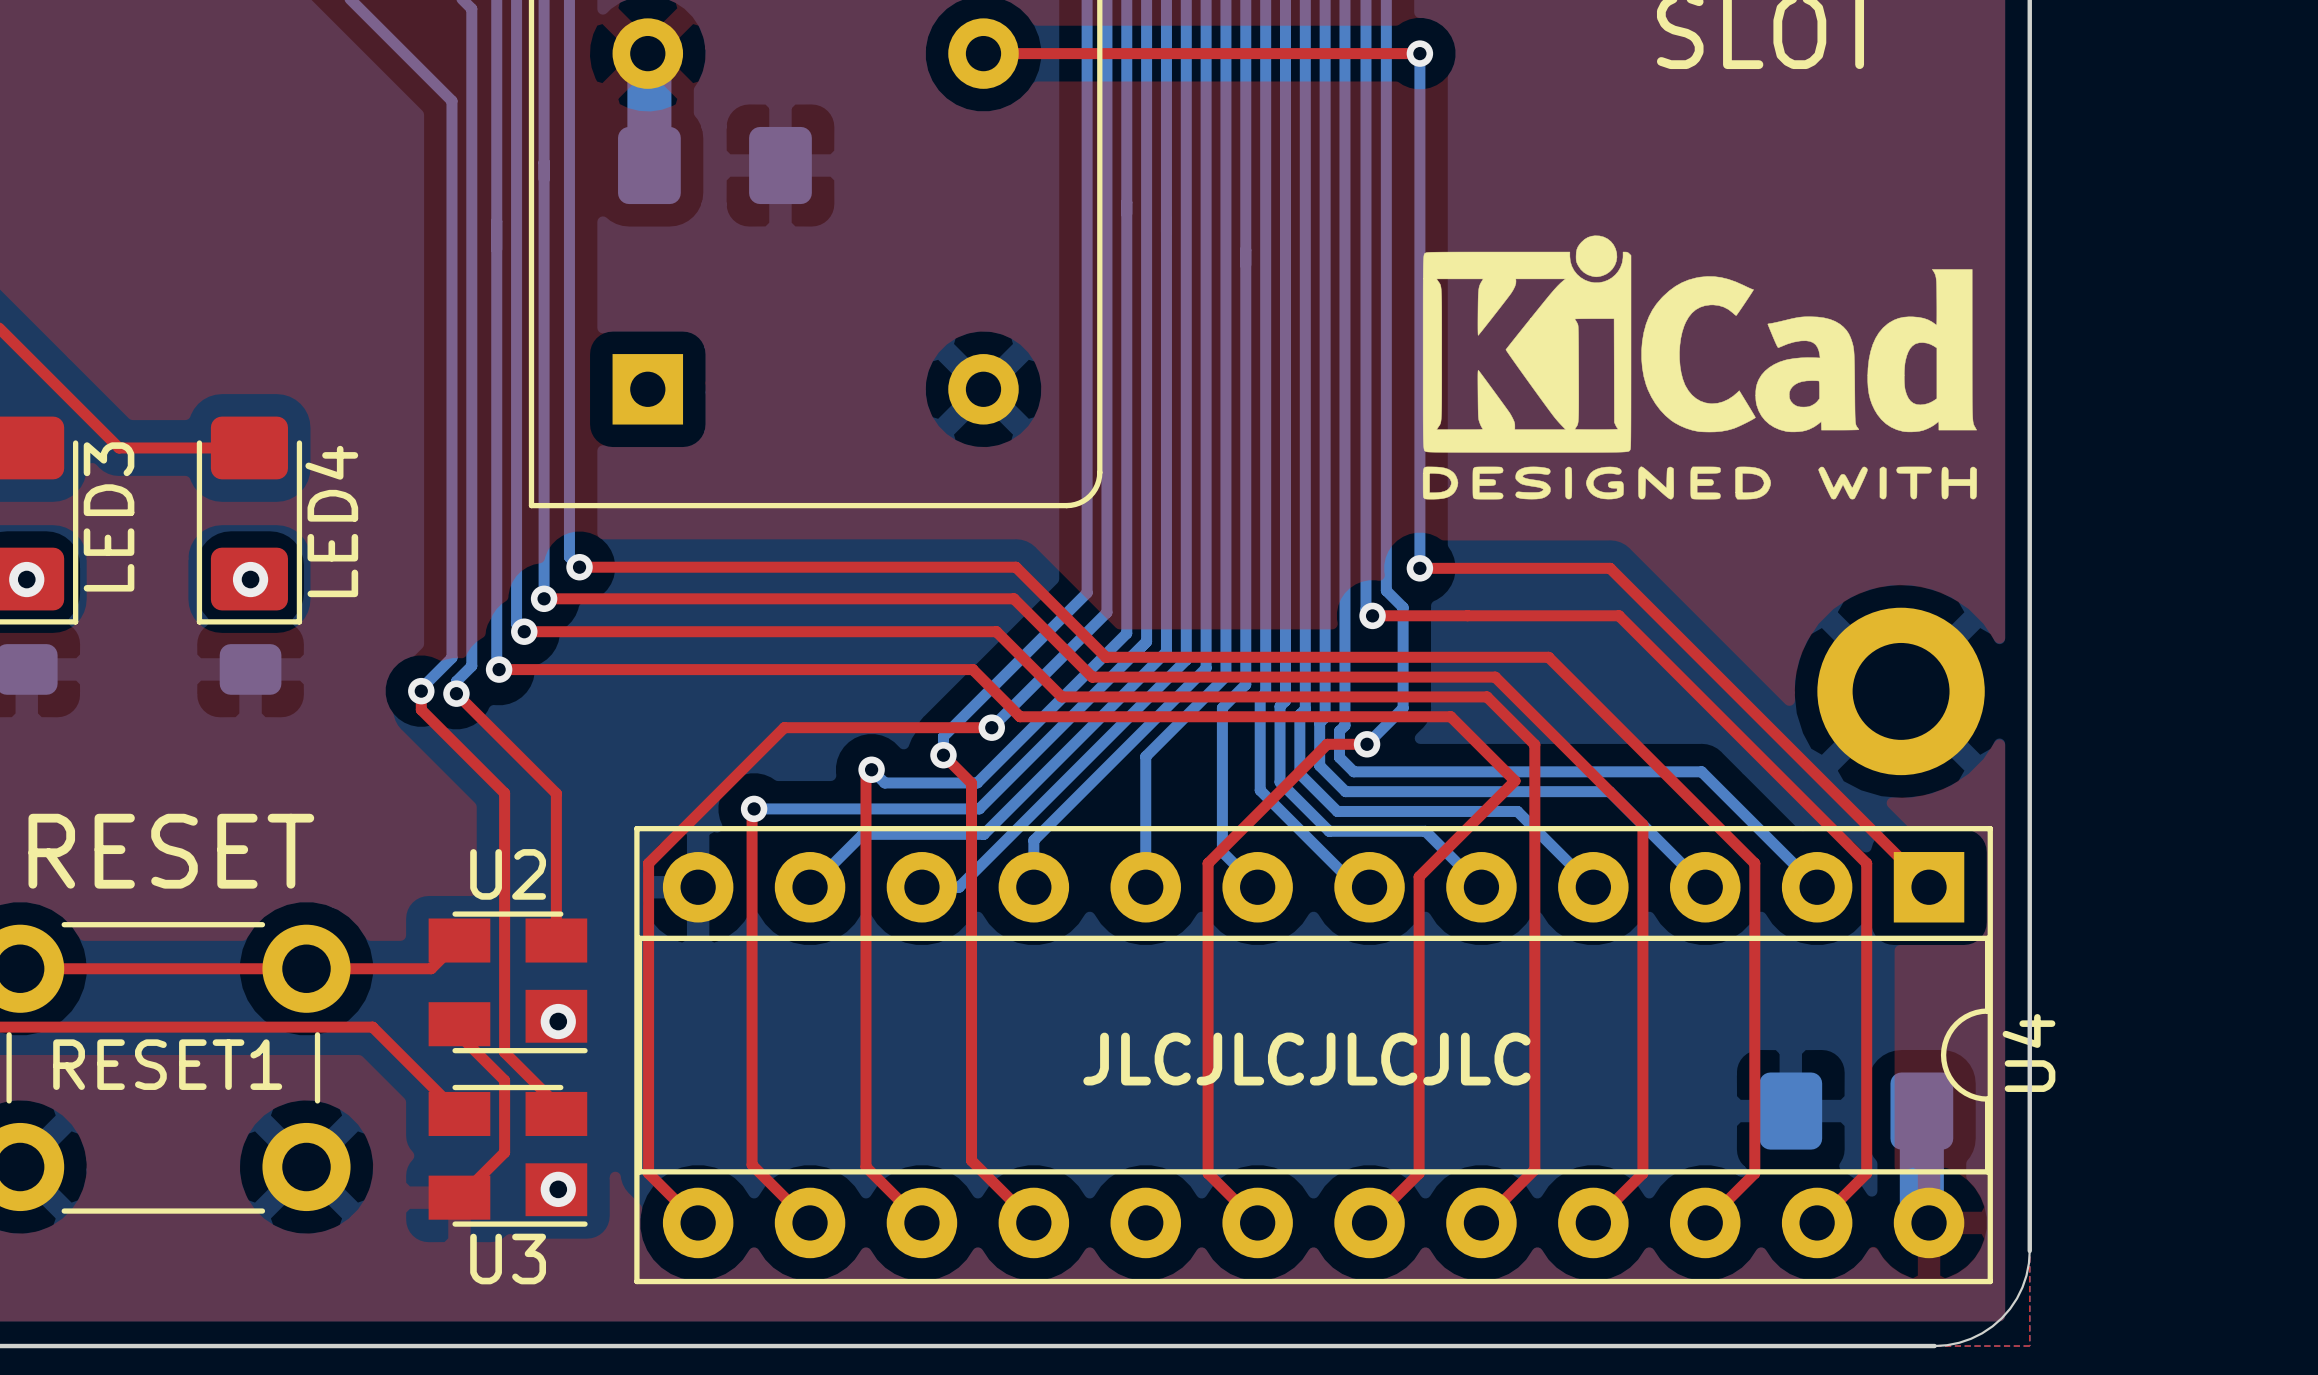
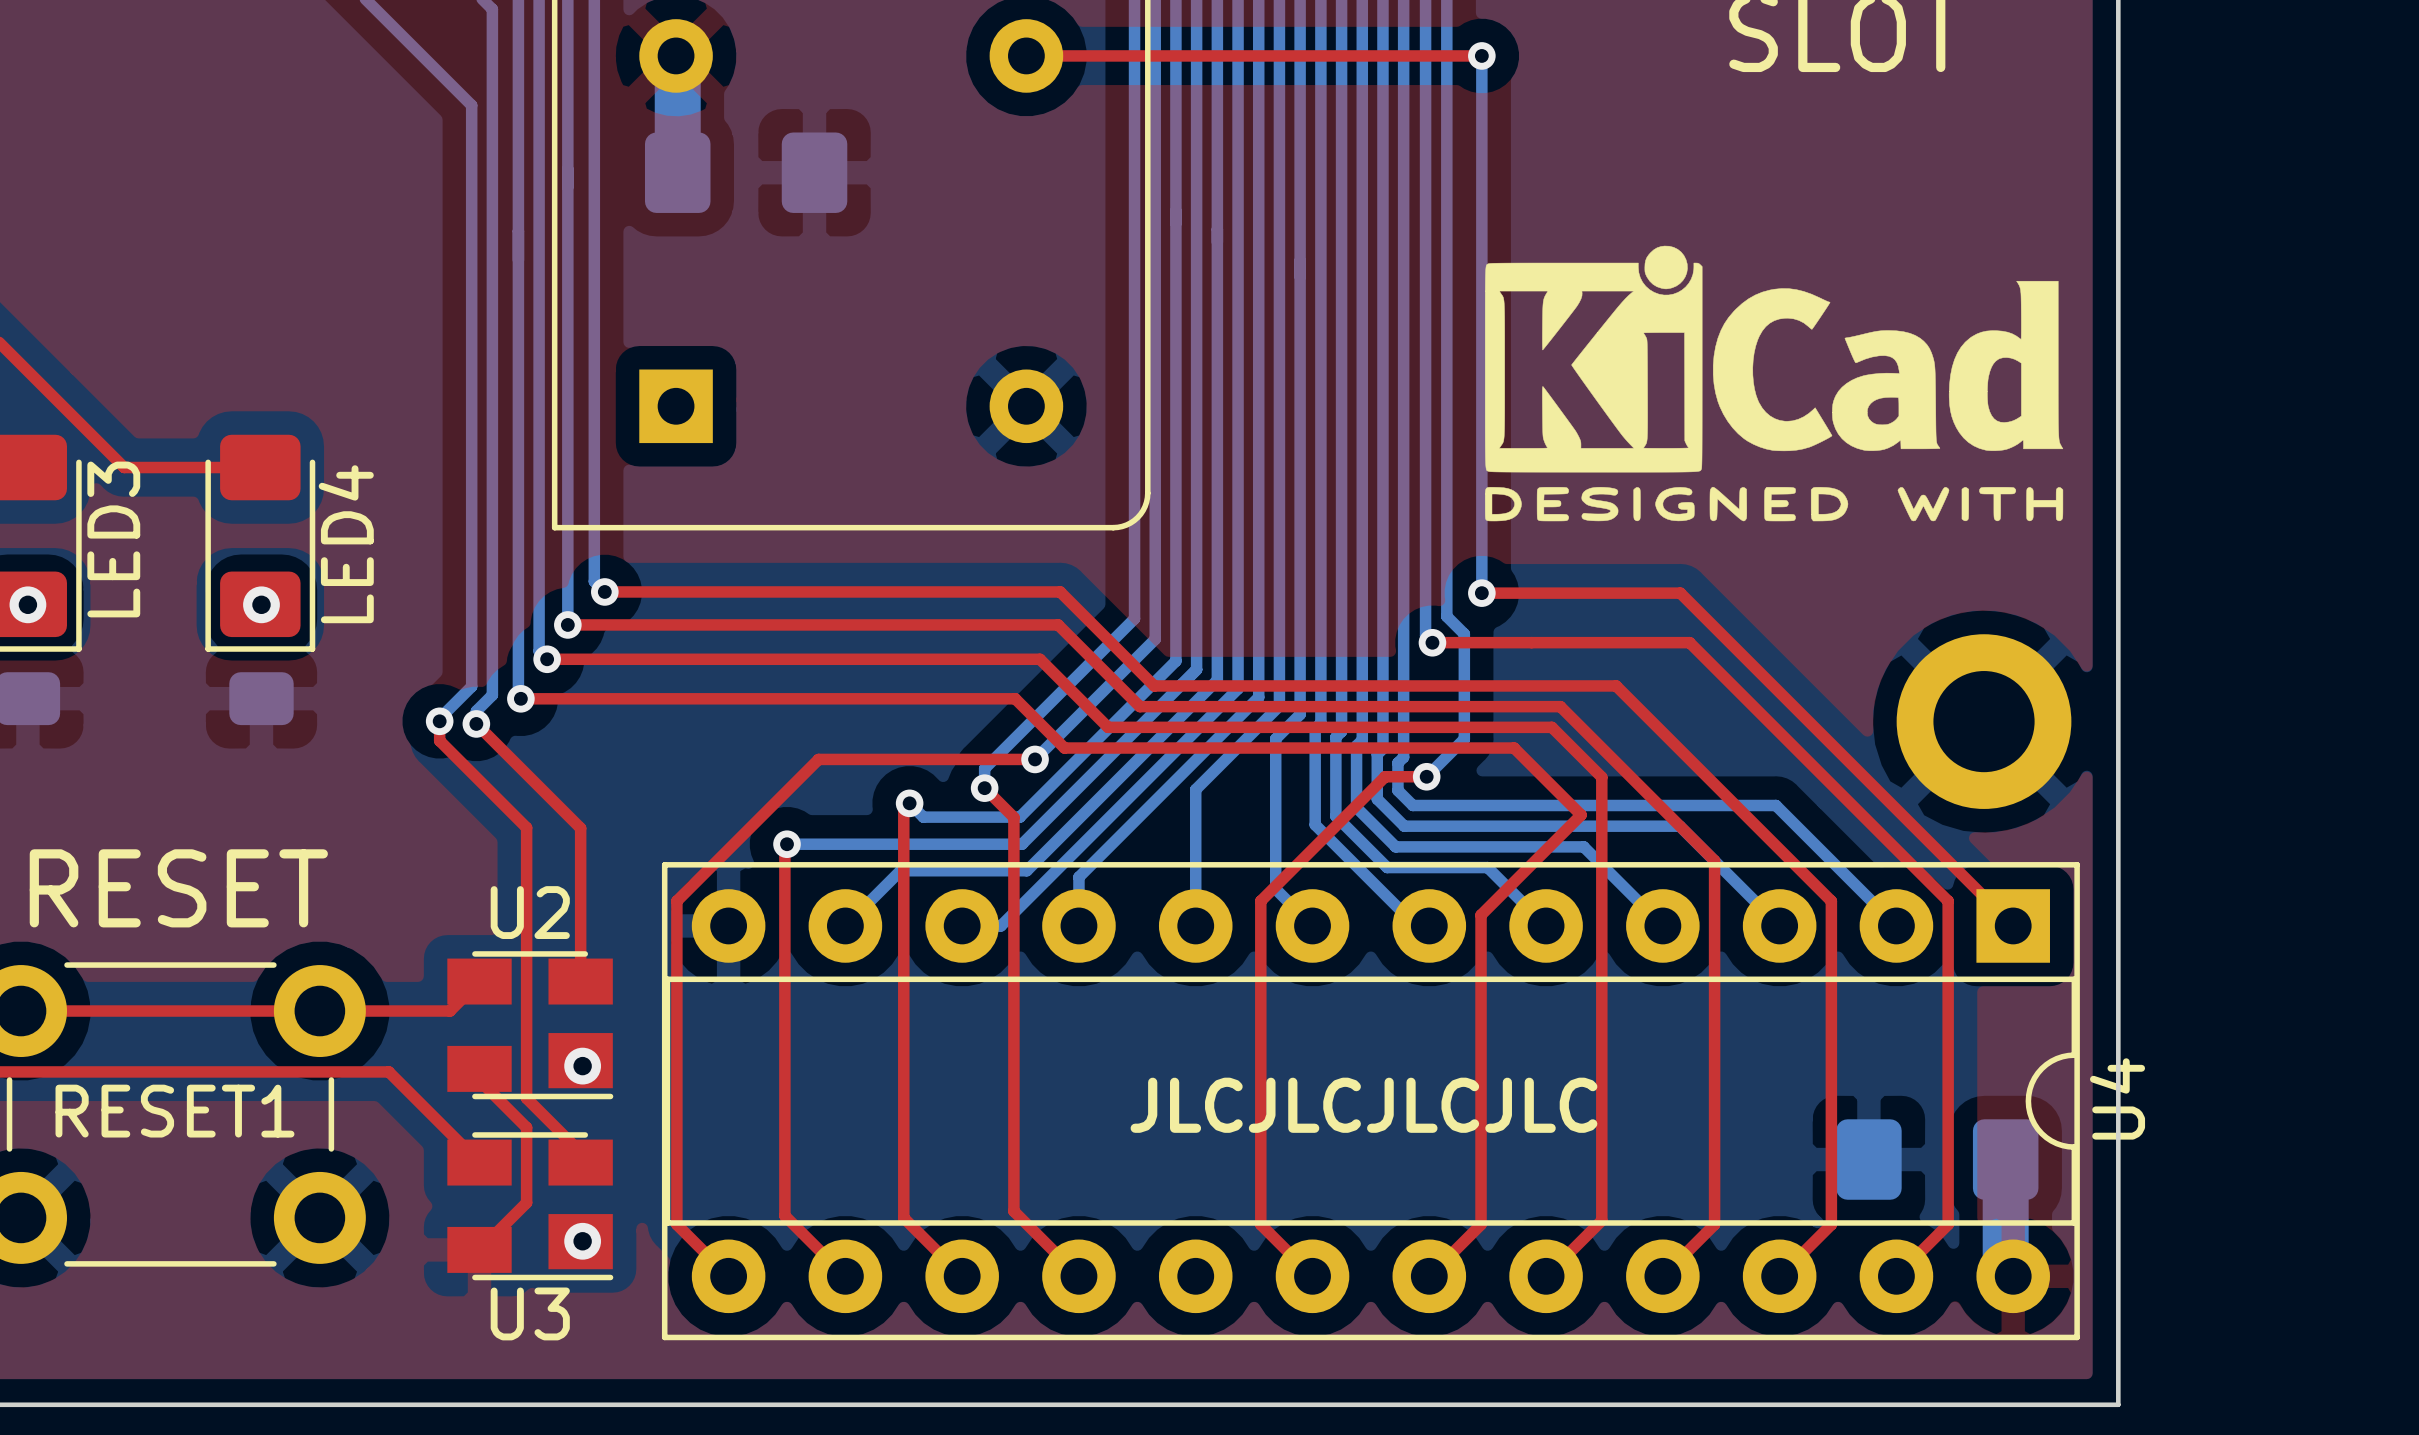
board edge: (2029, 1250) (2026, 1275) (2022, 1287) (2010, 1308) (2001, 1318) (1992, 1326) (1971, 1338) (1959, 1342) (1934, 1346) -> (2118, 1305) (2118, 1404) (2019, 1404)

